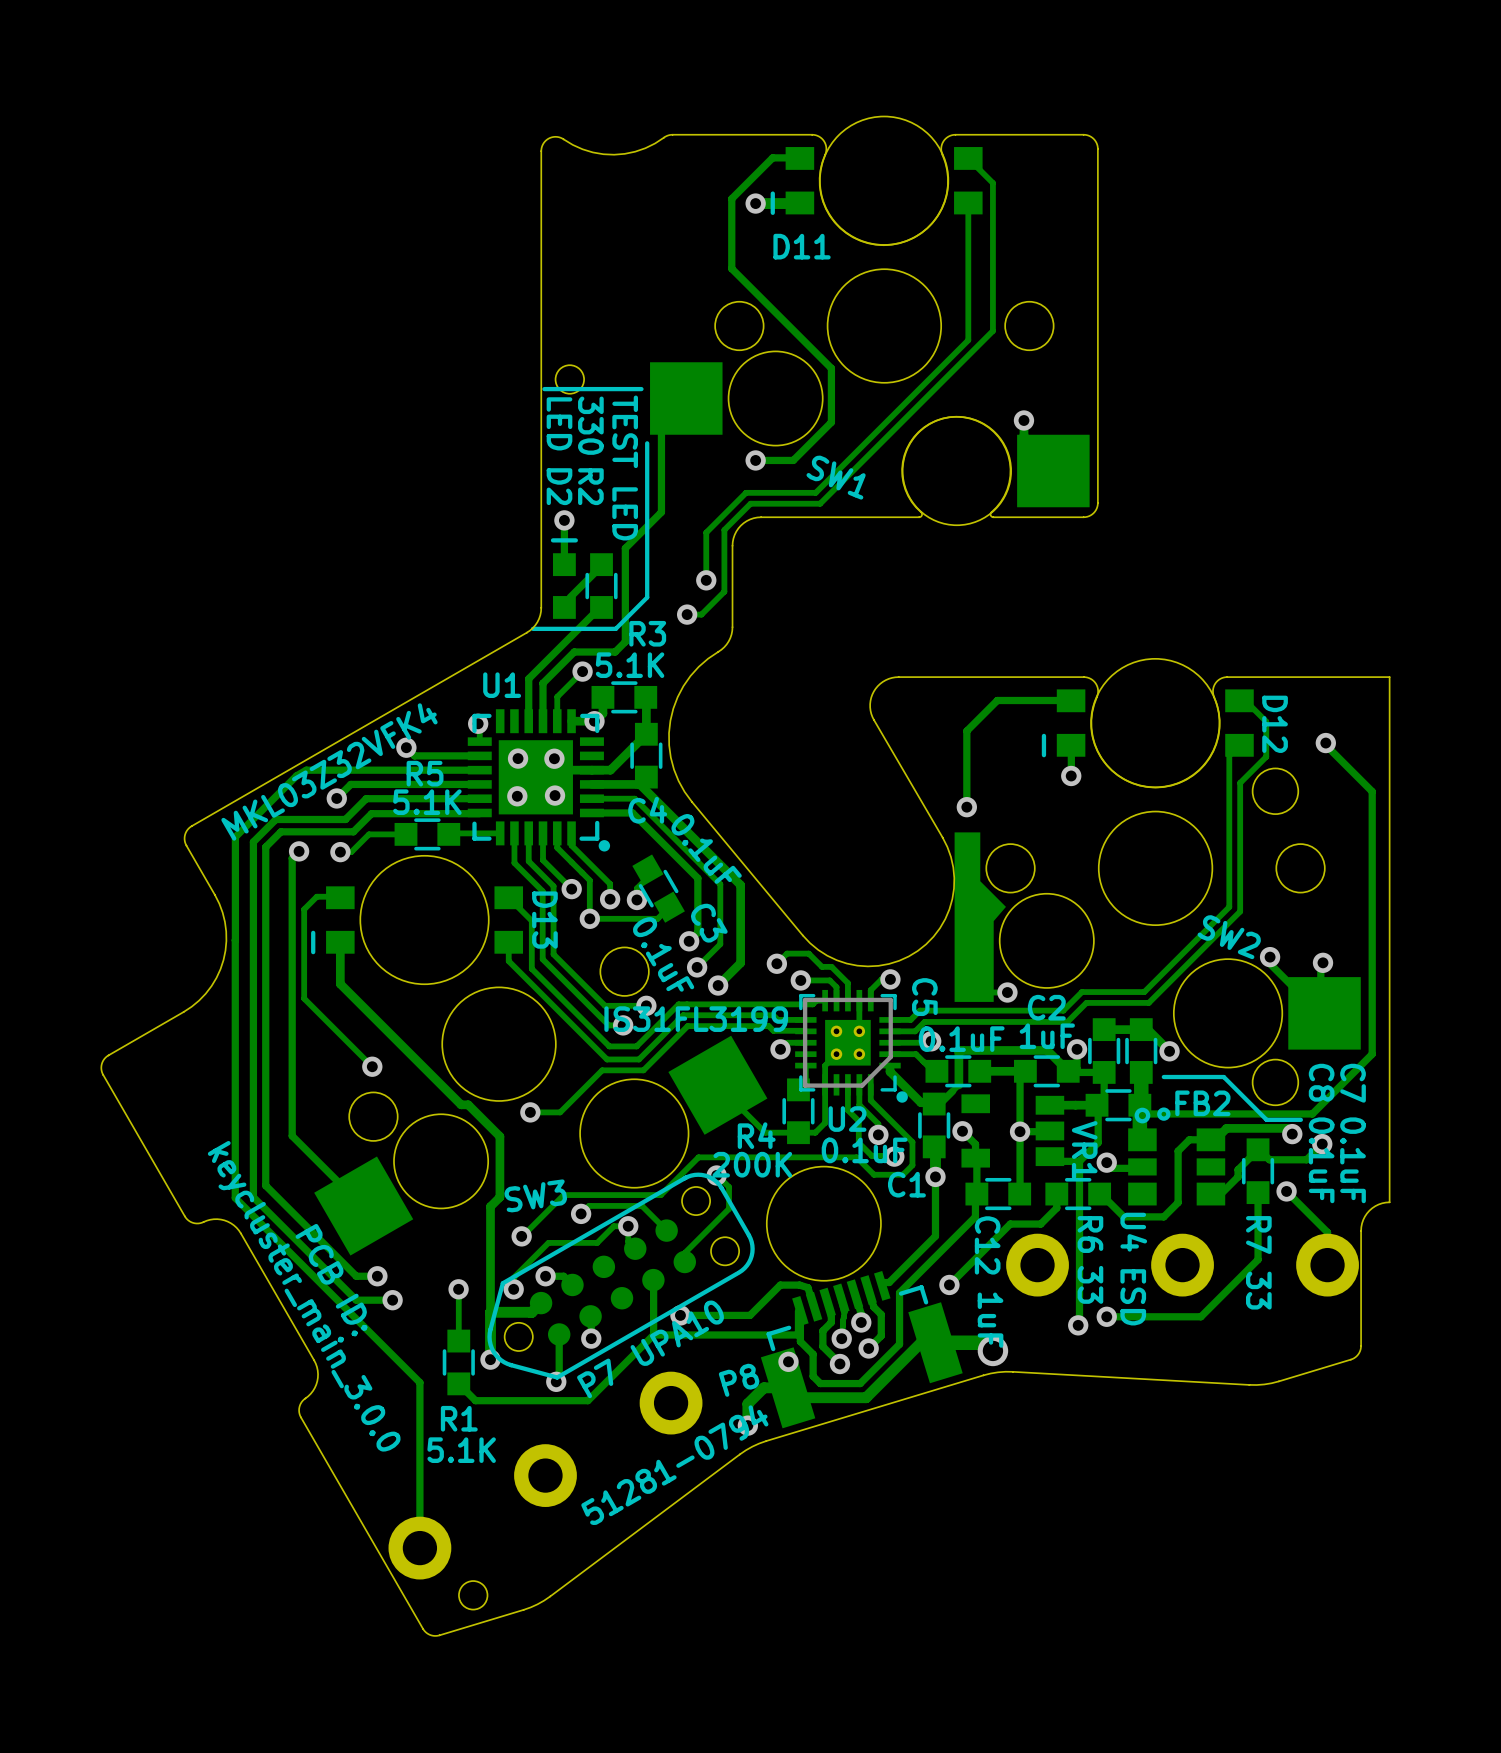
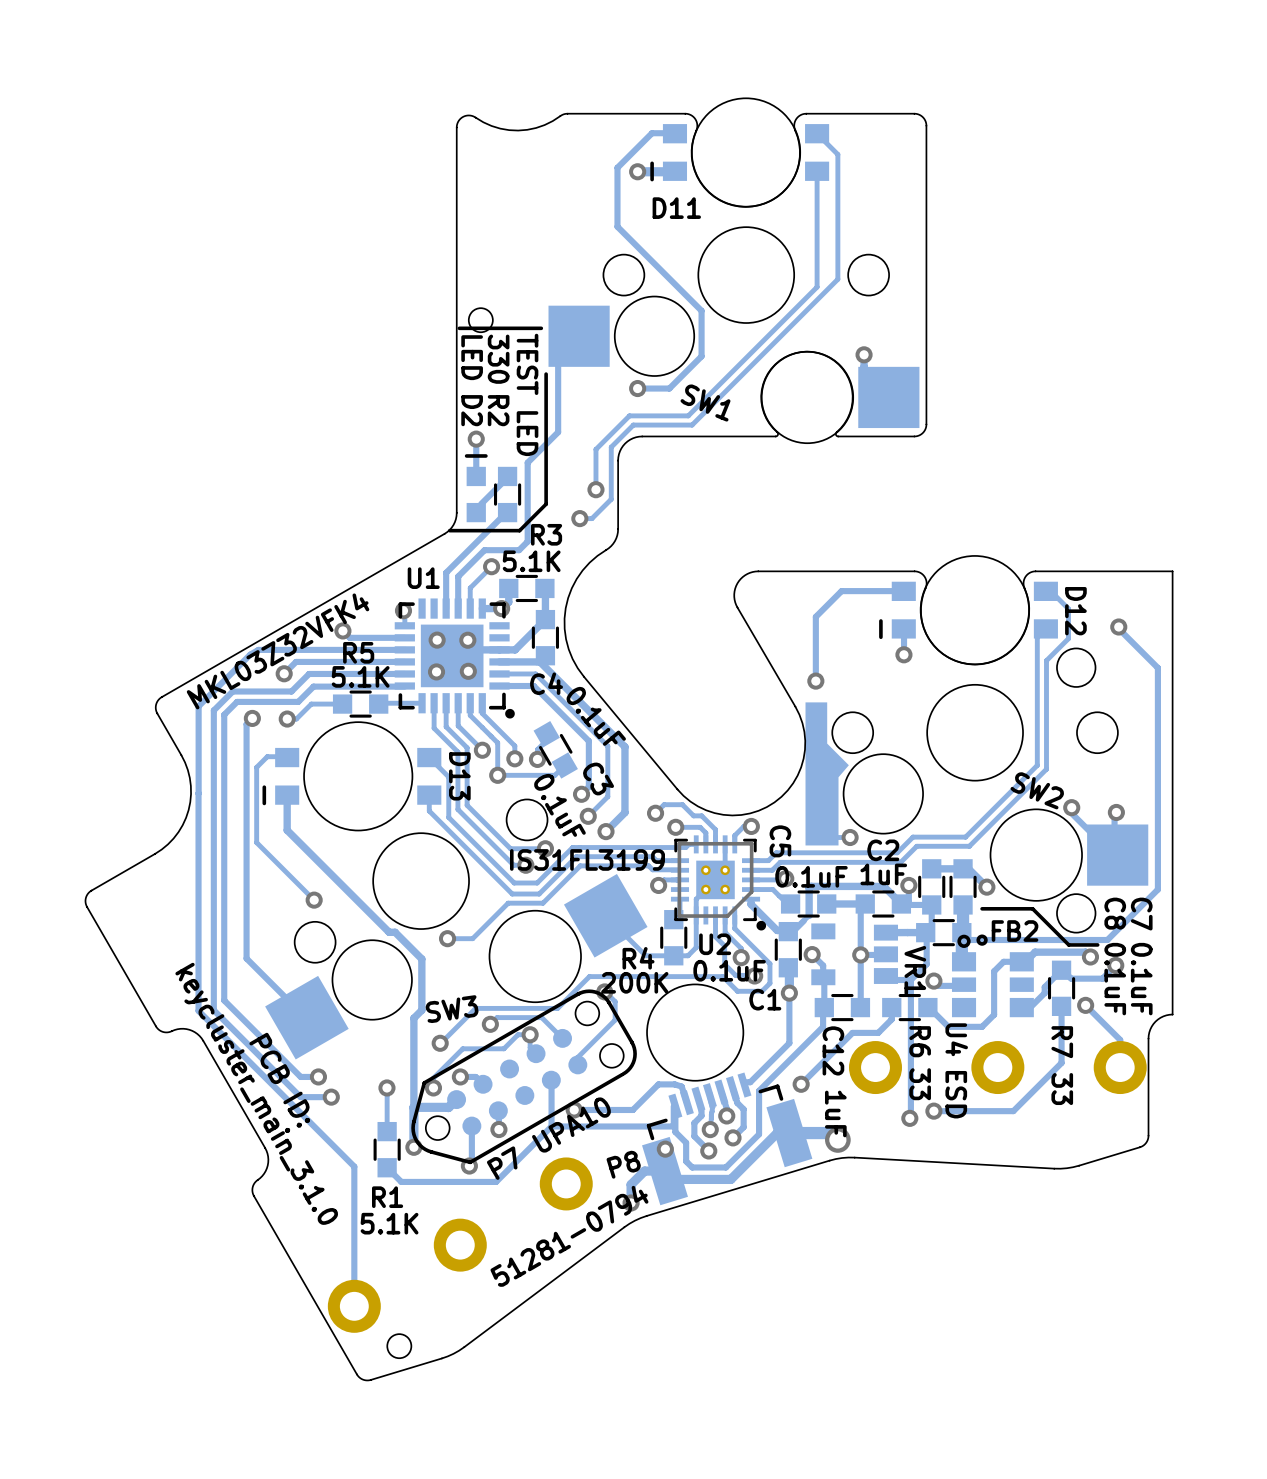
text: keycluster_main_3.0.0 (304, 1296) -> keycluster_main_3.1.0 (256, 1093)

